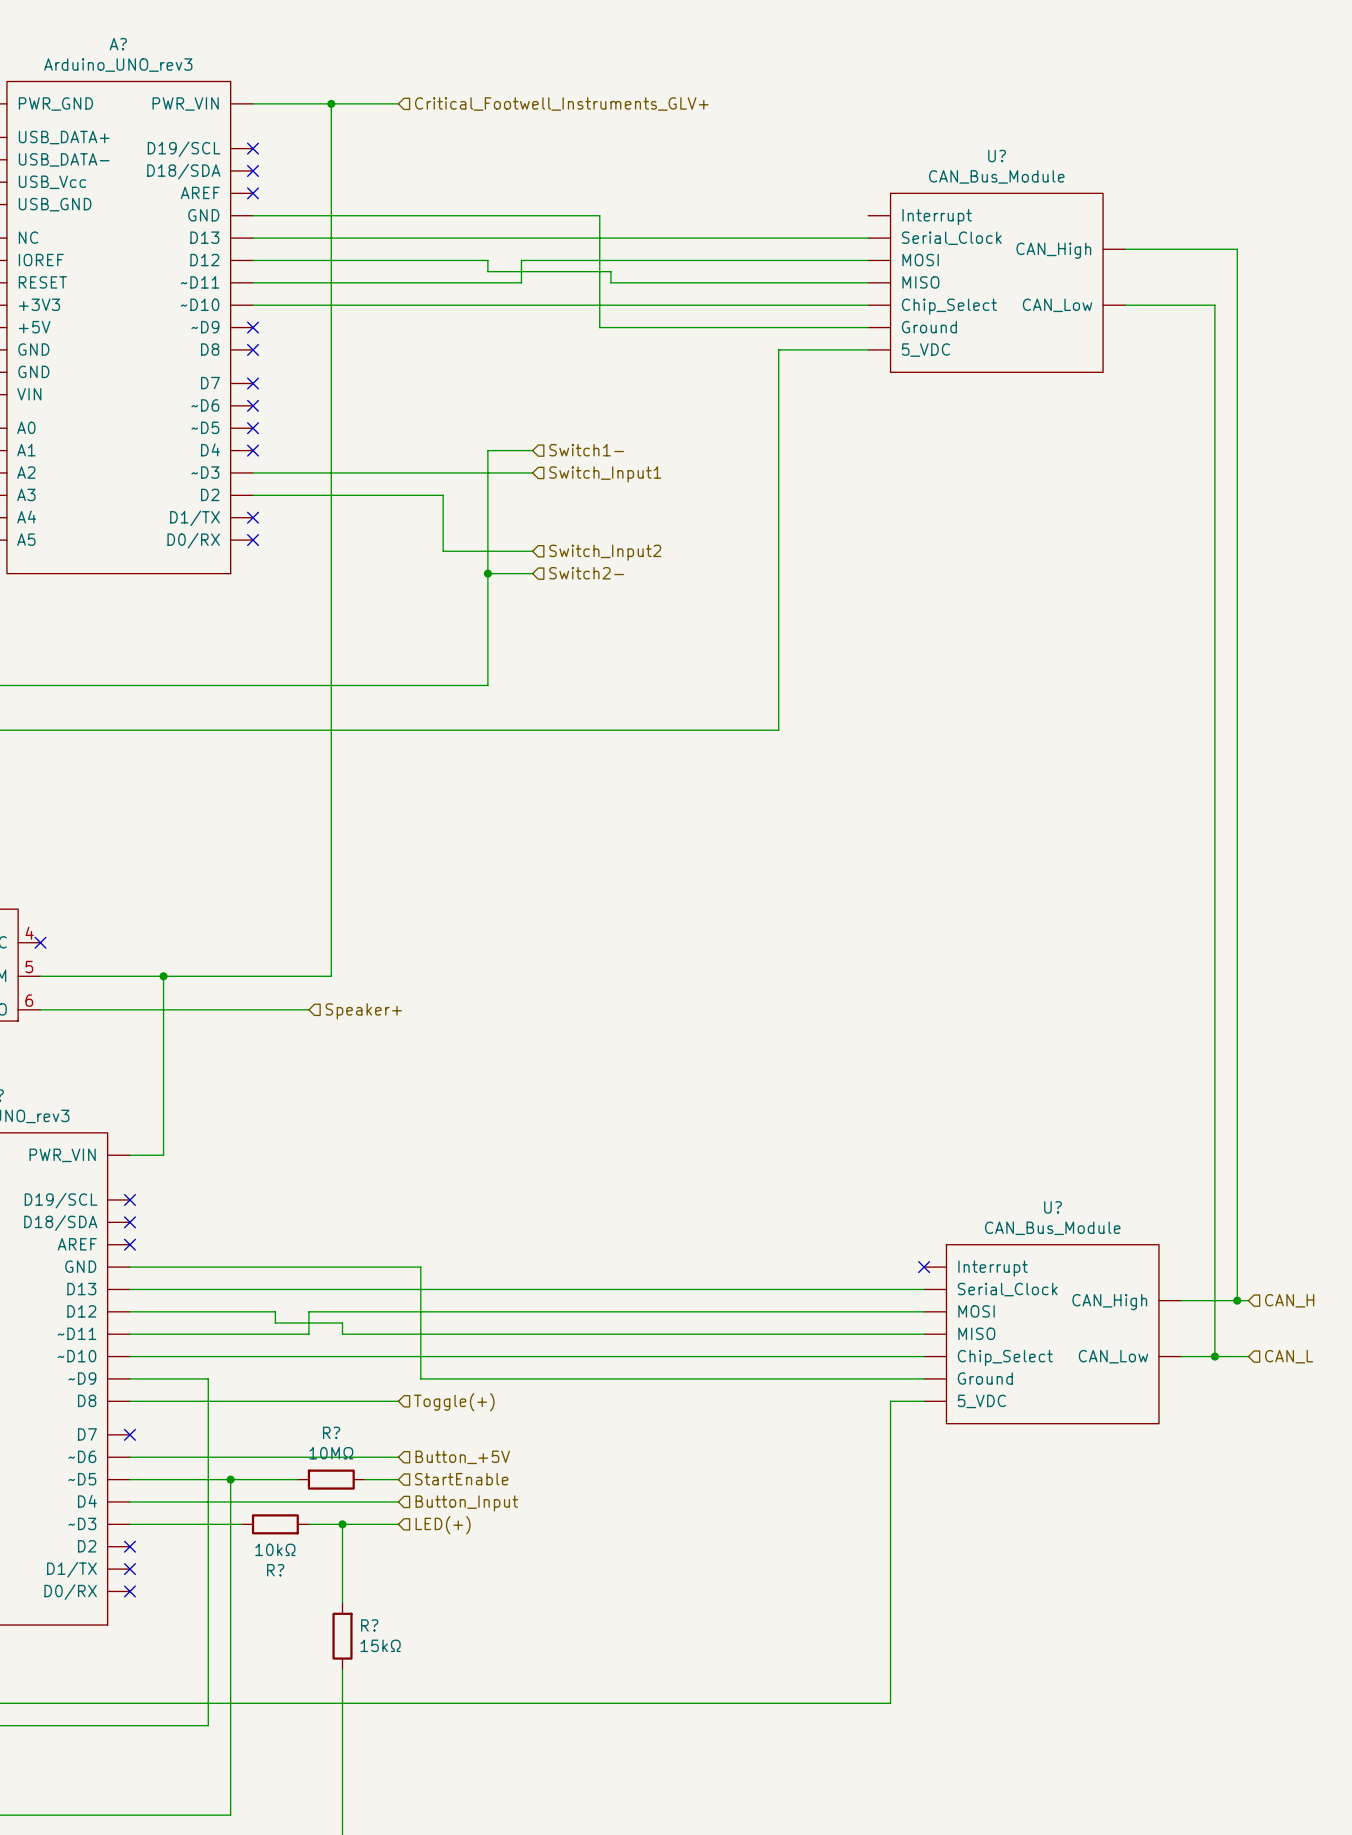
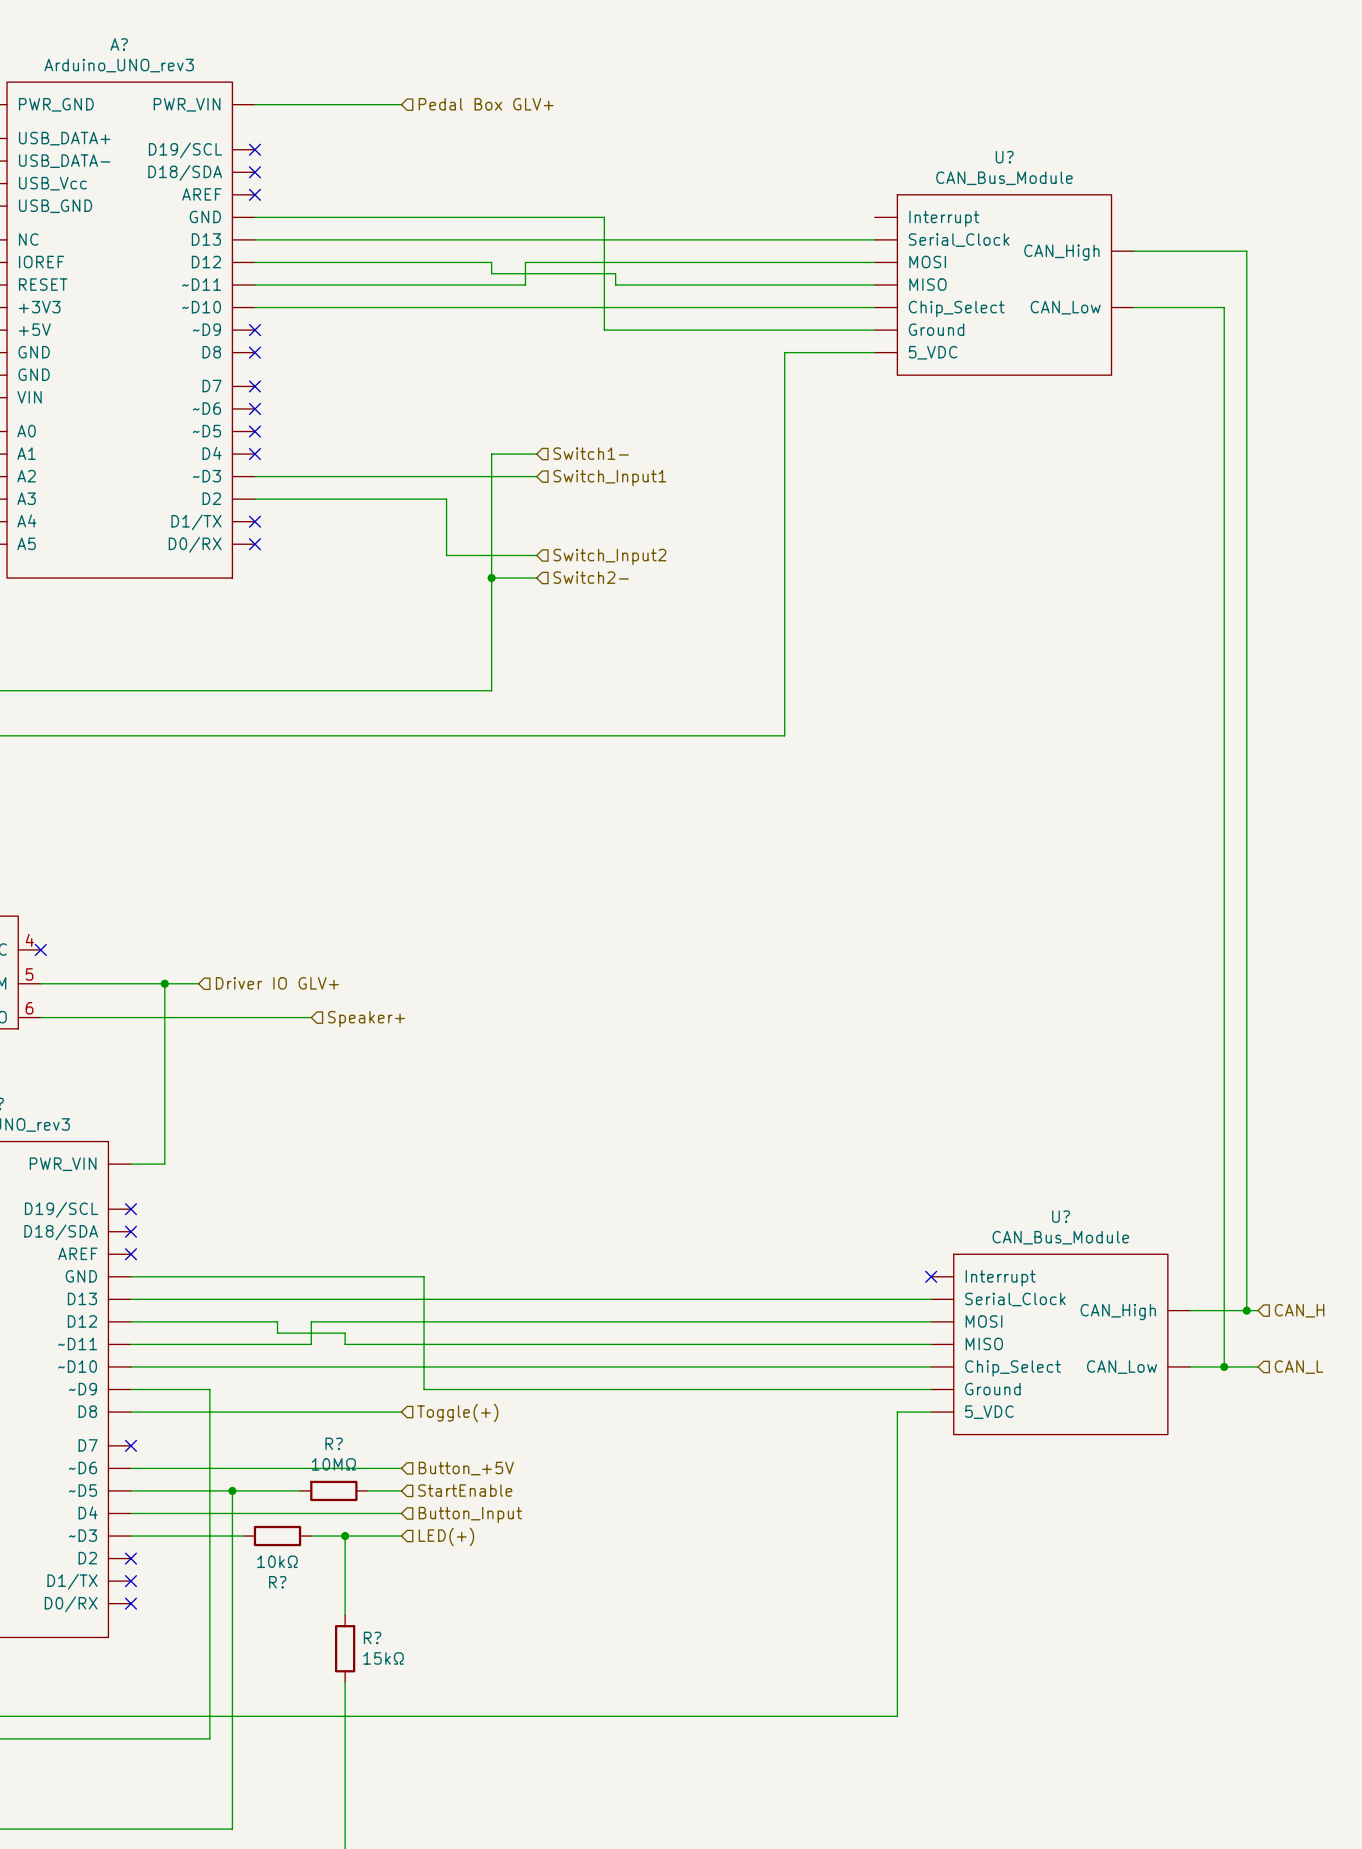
wire: (331, 103) (331, 976) (197, 976) -> none
junction: (331, 103) -> none
hierarchical label: Critical_Footwell_Instruments_GLV+ (561, 103) -> Pedal Box GLV+ (486, 104)
hierarchical label: none -> Driver IO GLV+ (277, 983)

